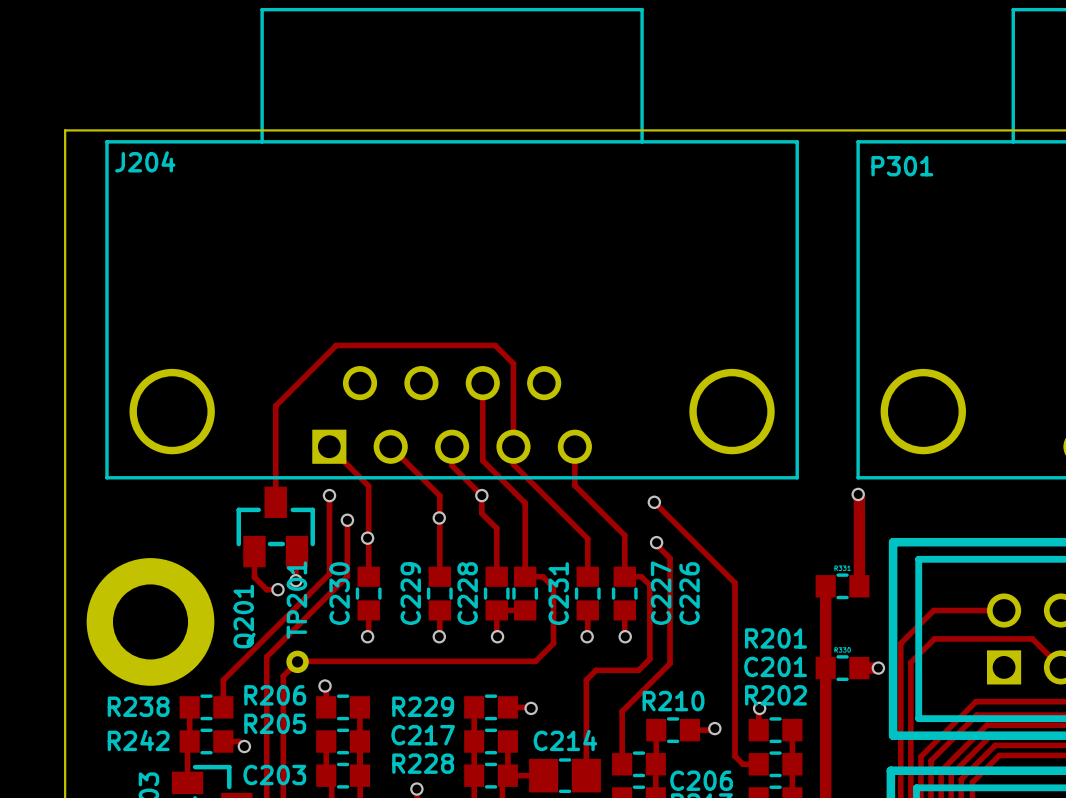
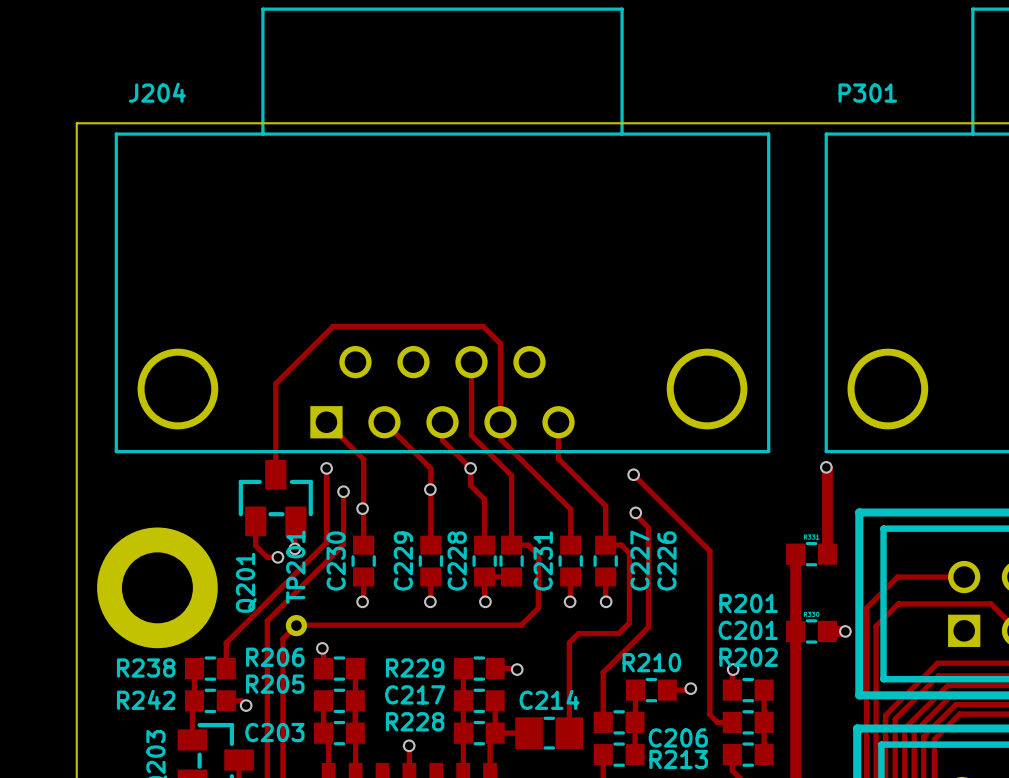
J204 name position: J204 (145, 161) -> J204 (157, 92)
P301 name position: P301 (902, 166) -> P301 (867, 93)

